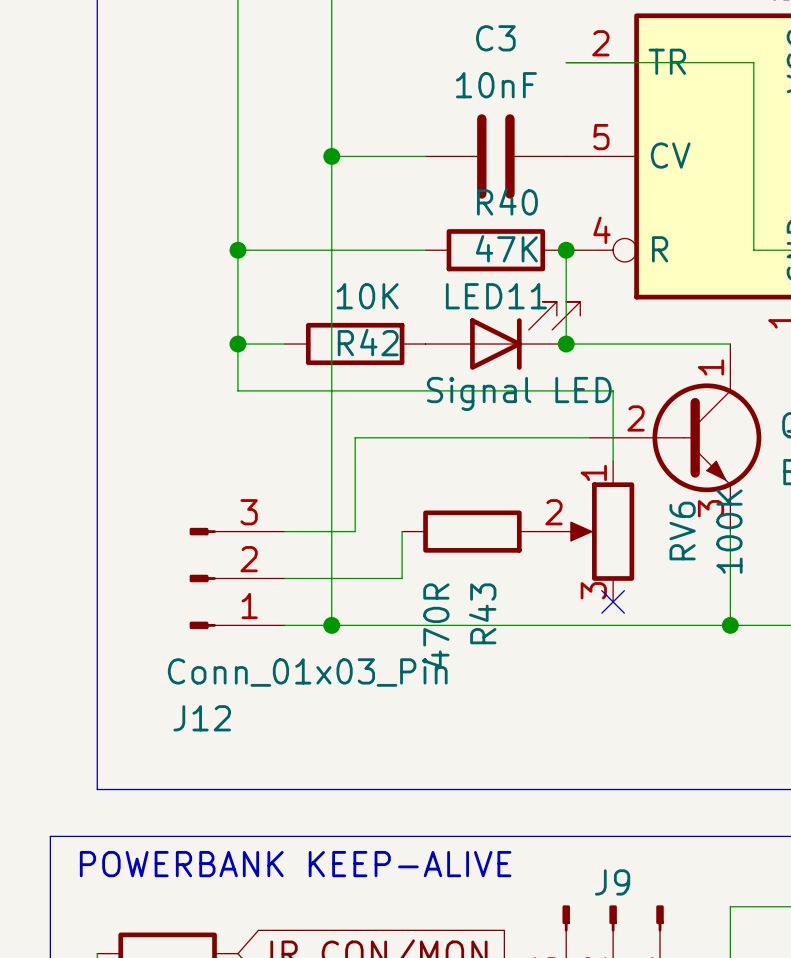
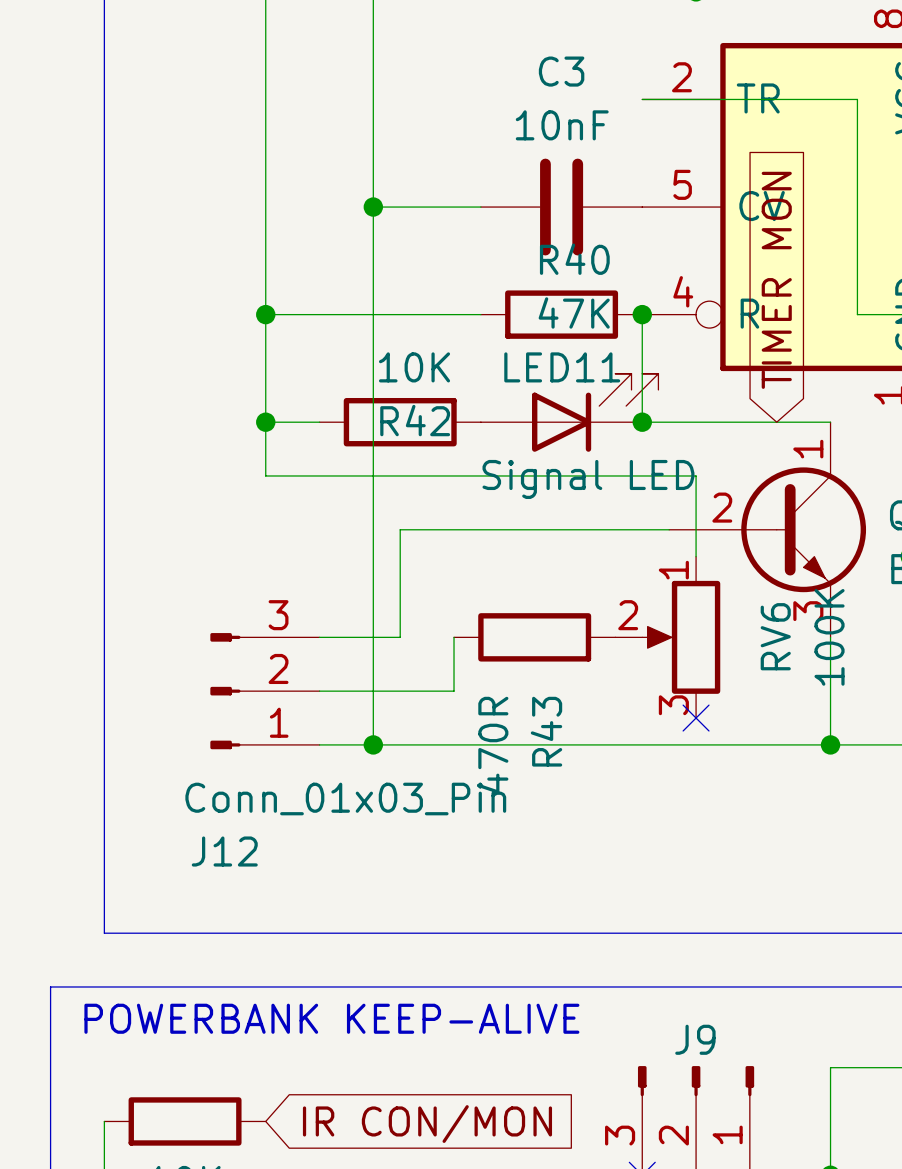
global label: none -> TIMER MON (776, 280)

